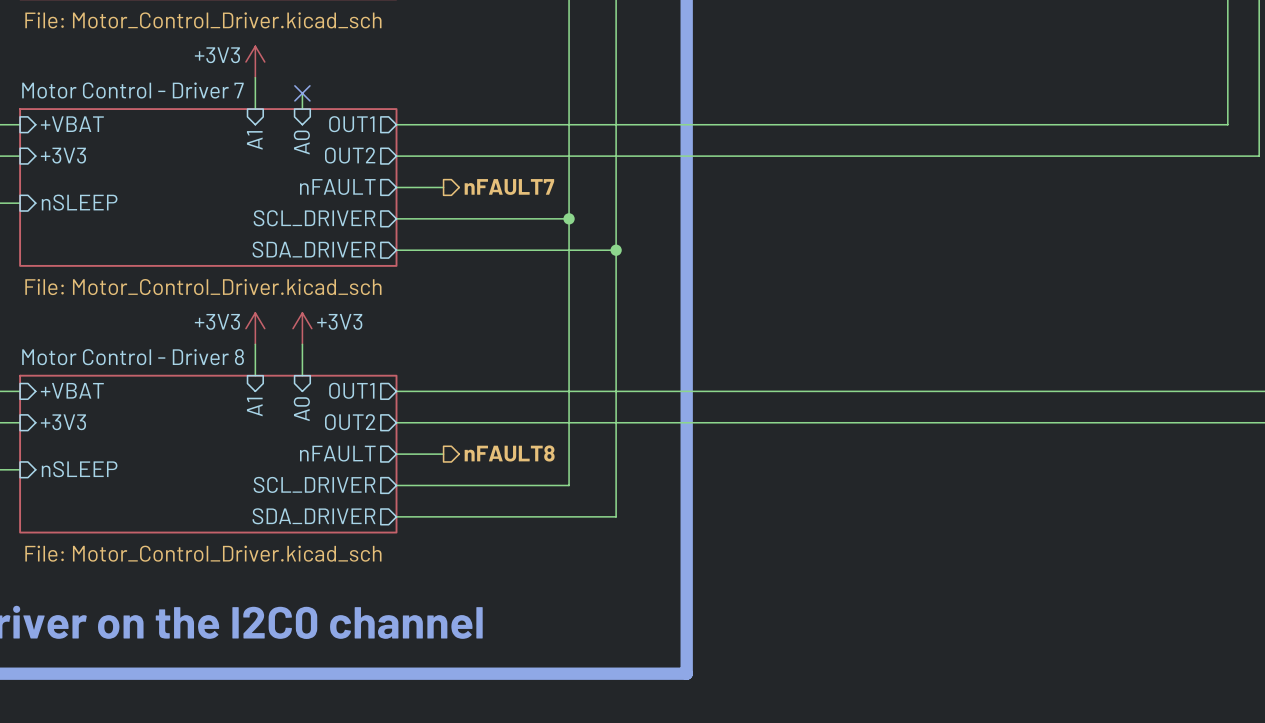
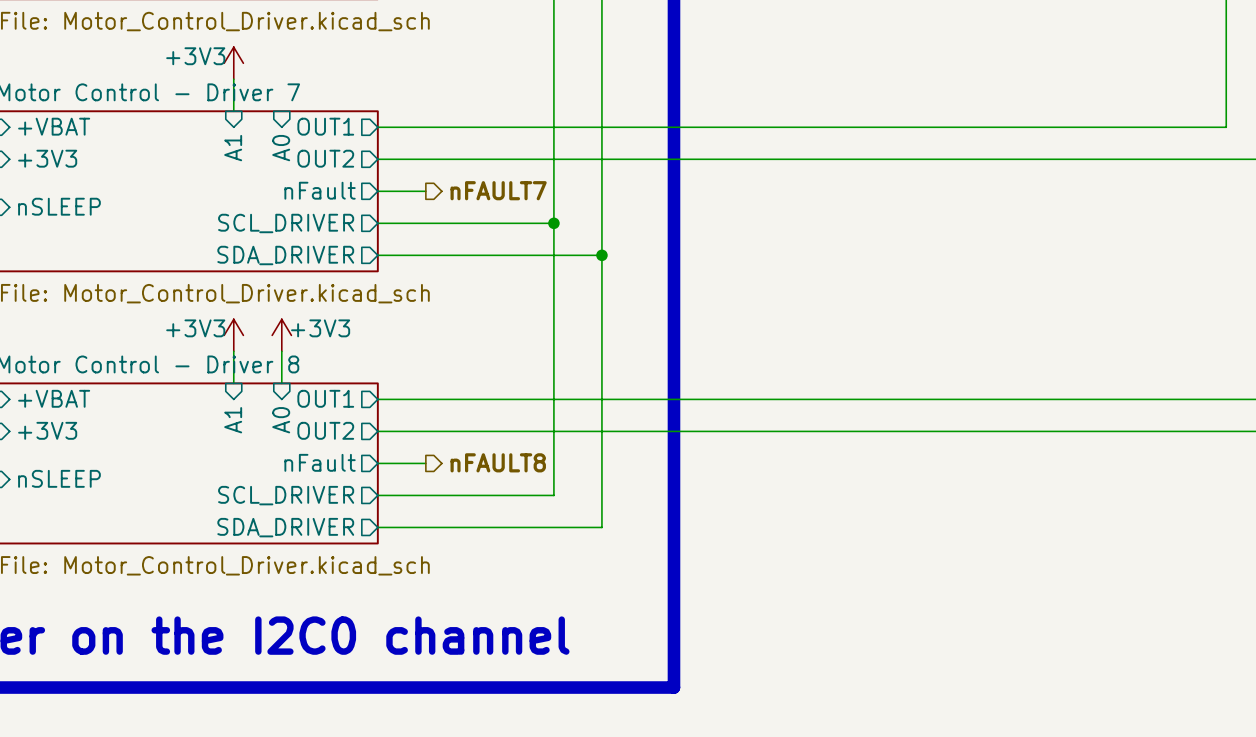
wire: (302, 93) (302, 109) -> none
no-connect mark: (302, 93) -> none
sheet pin: nFAULT (337, 186) -> nFault (320, 190)
sheet pin: nFAULT (337, 453) -> nFault (320, 462)

